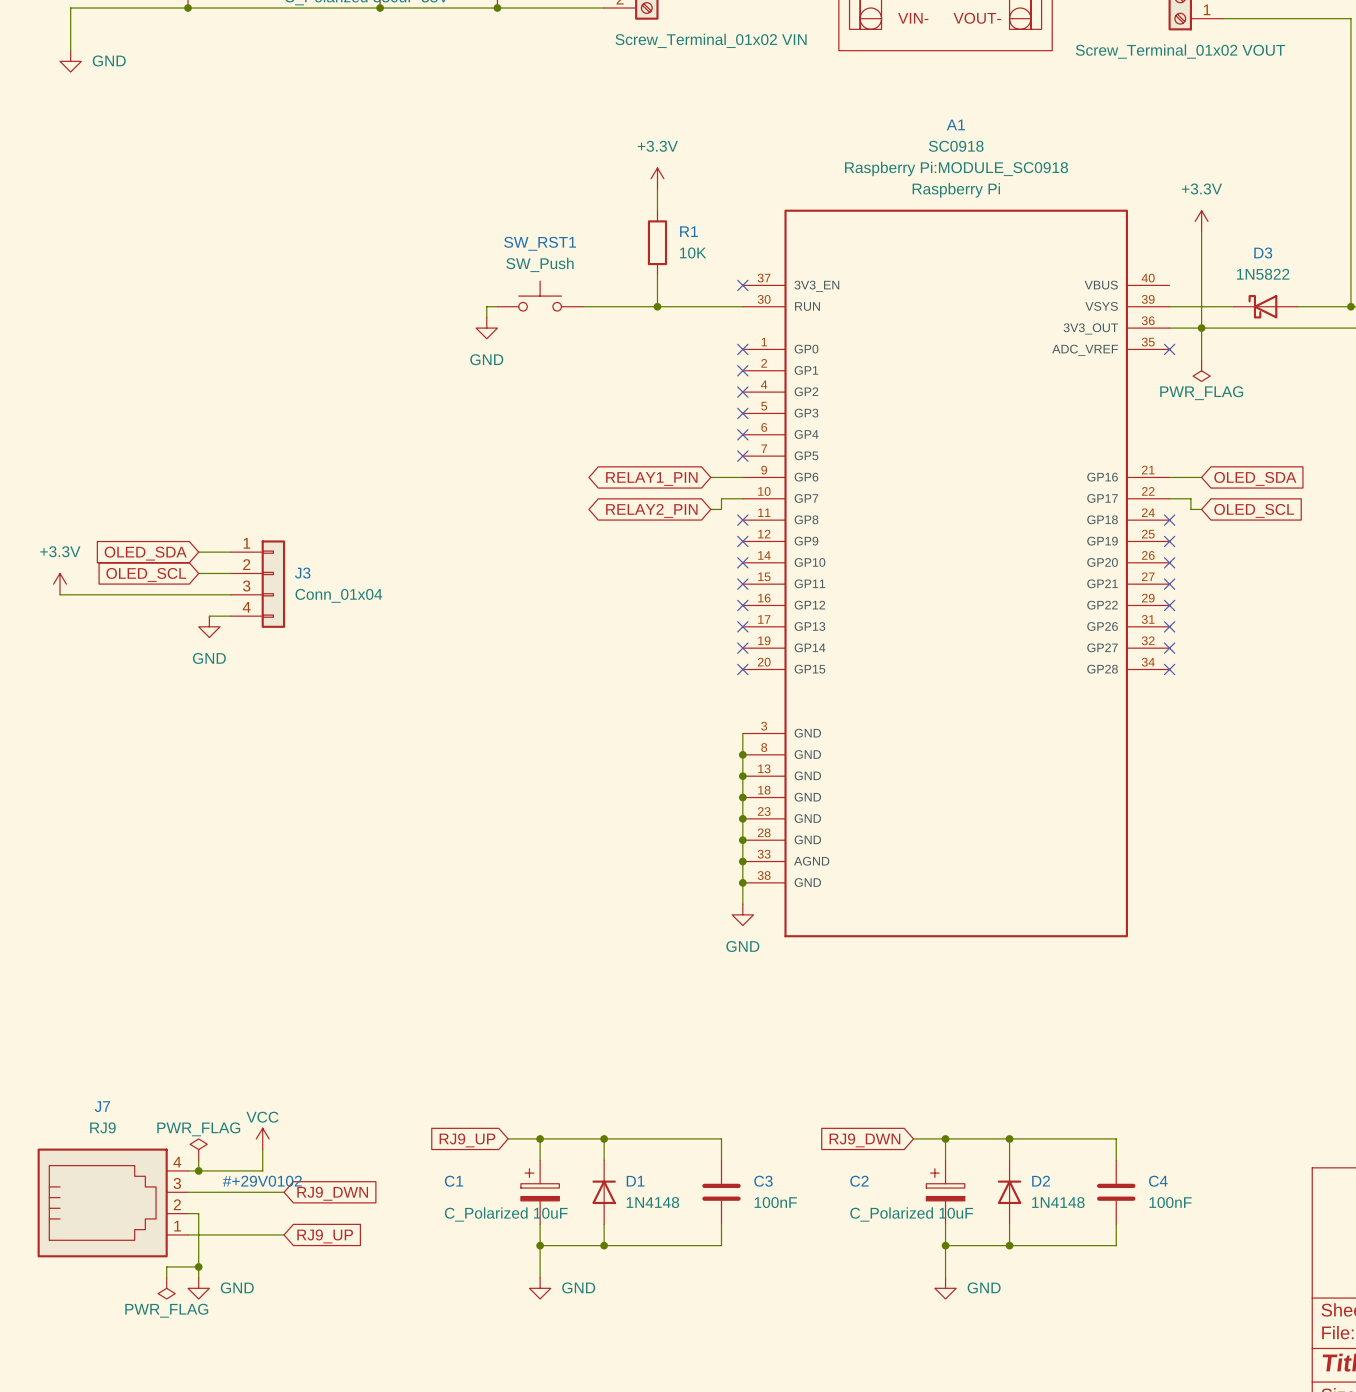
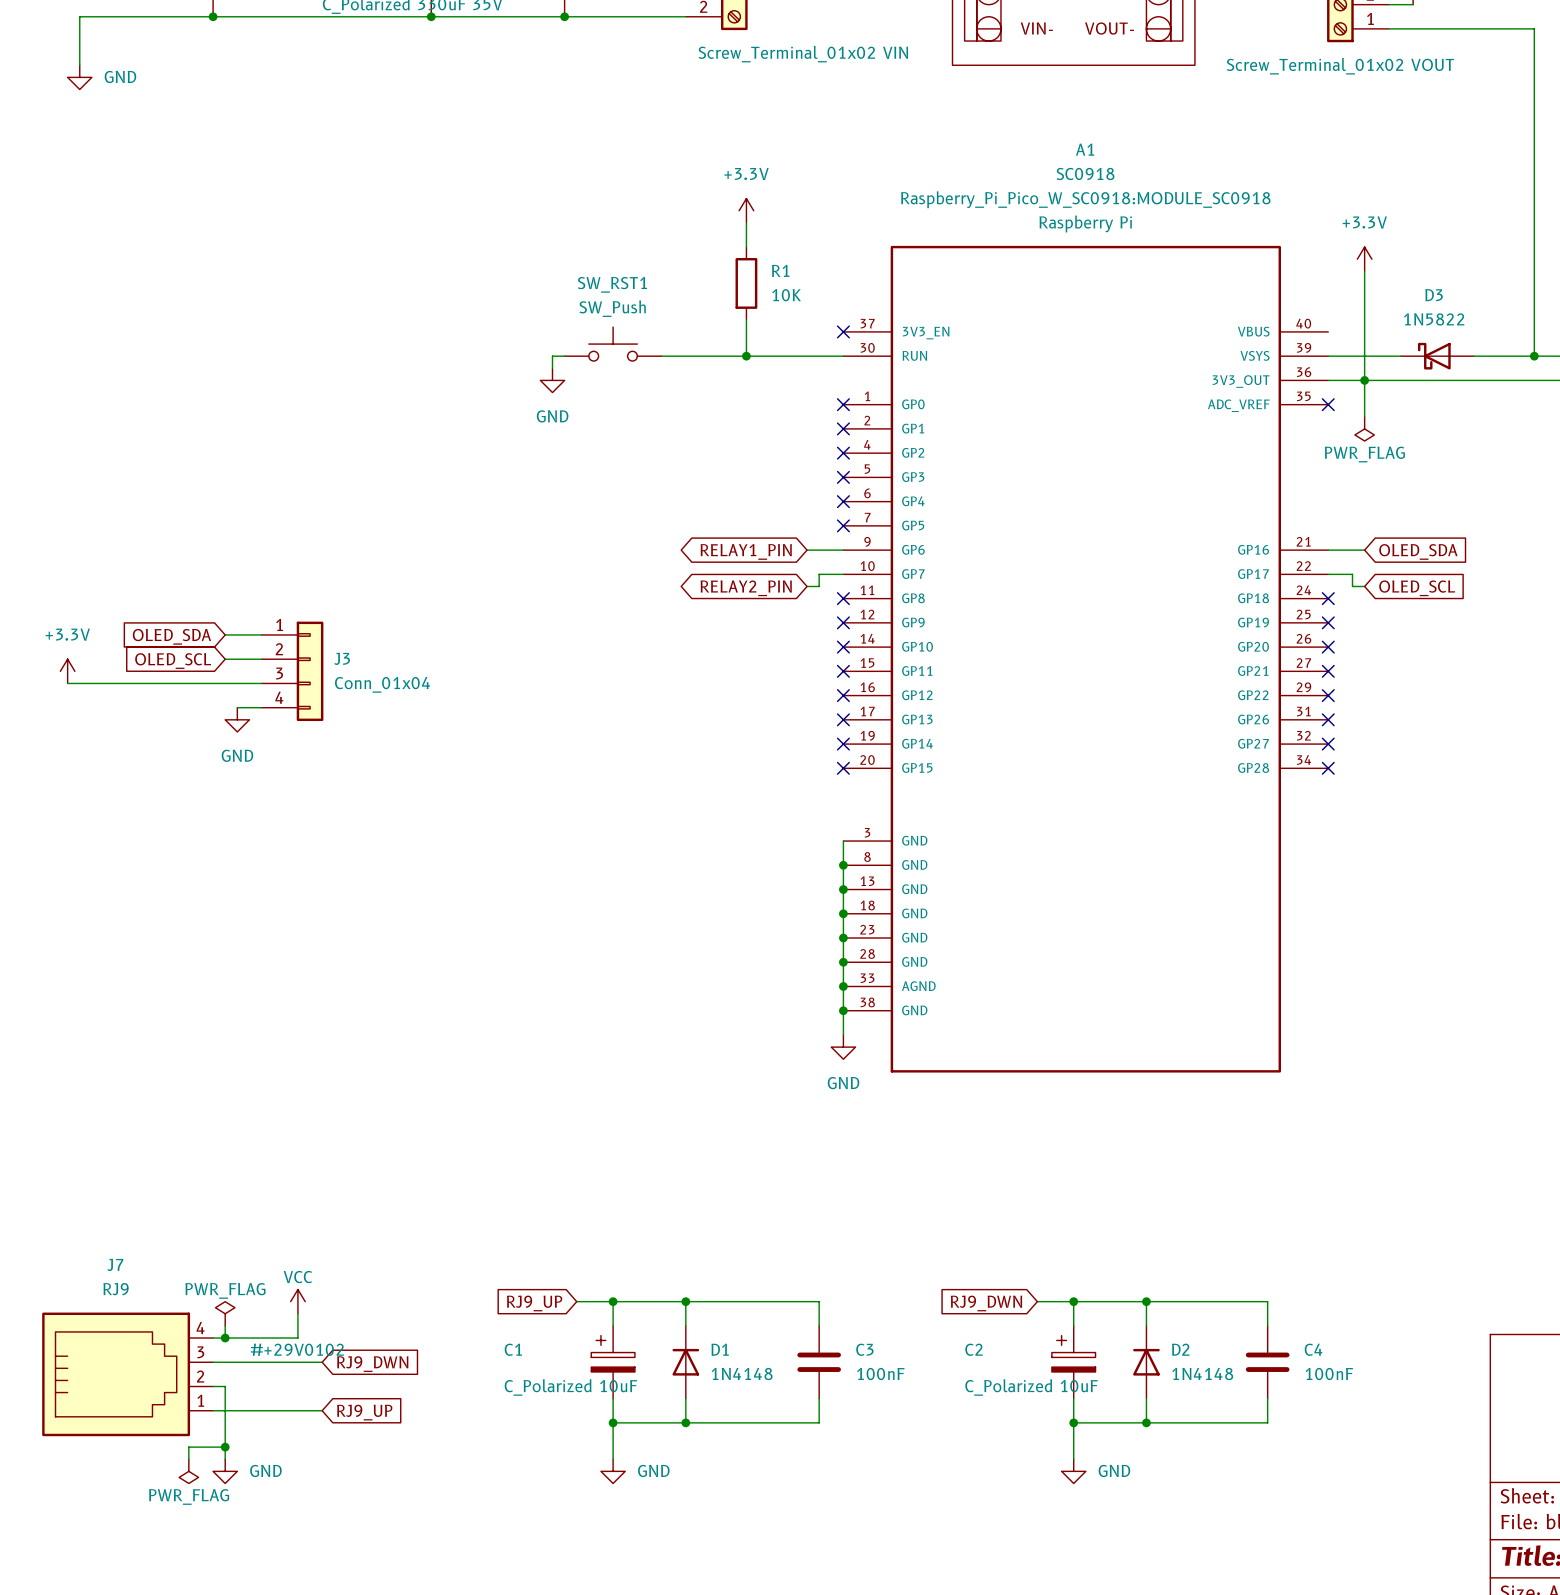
A1 text: Raspberry Pi:MODULE_SC0918 (956, 168) -> Raspberry_Pi_Pico_W_SC0918:MODULE_SC0918 (1085, 199)

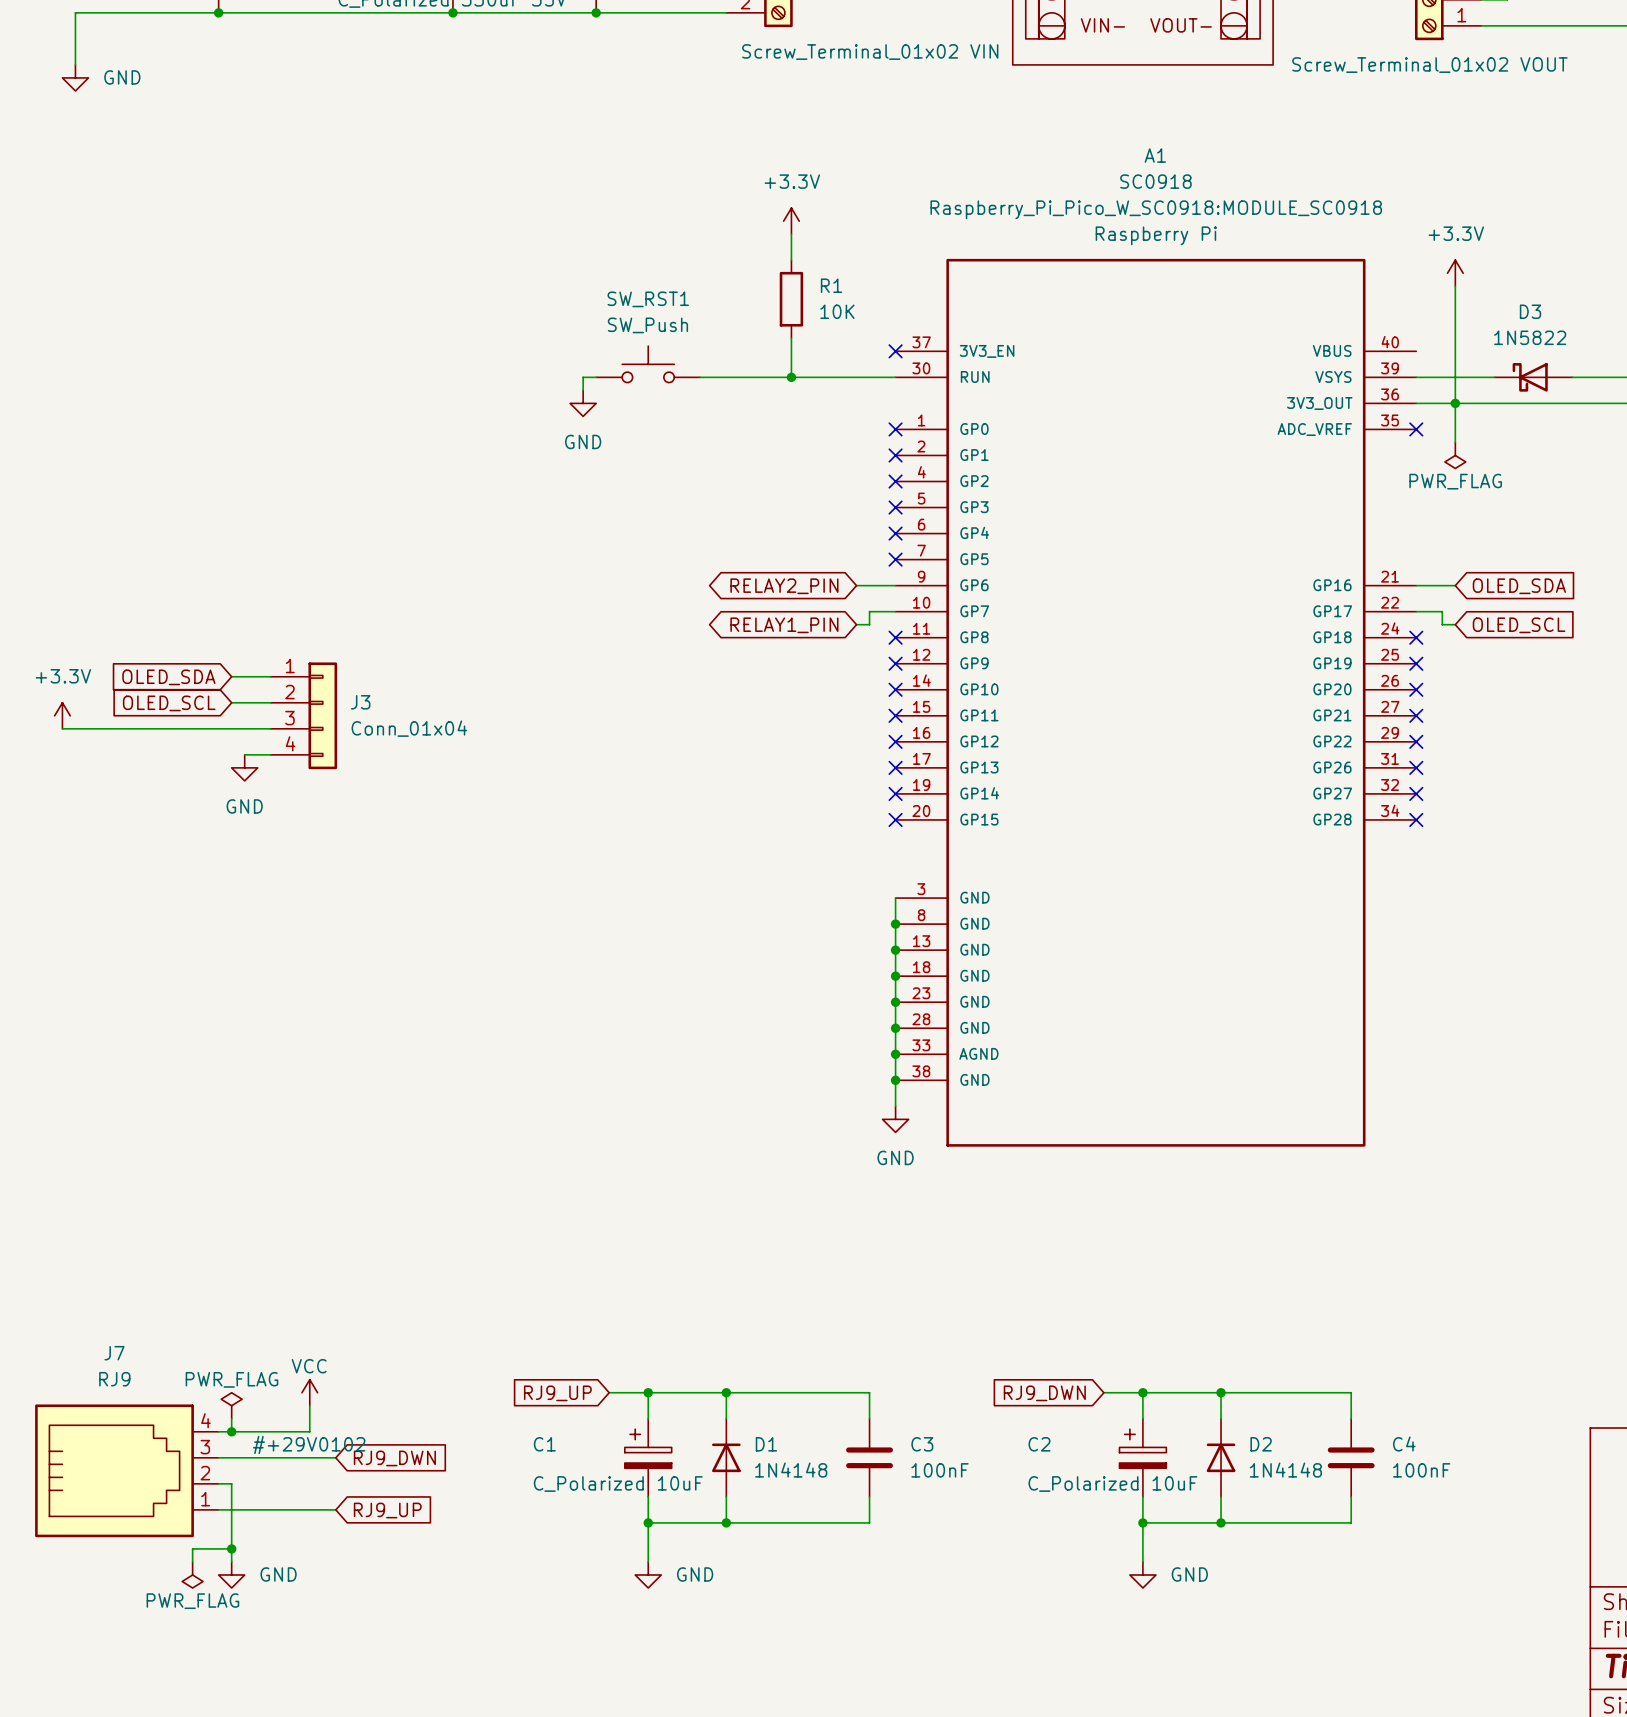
global label: RELAY1_PIN (746, 551) -> RELAY2_PIN (784, 586)
global label: RELAY2_PIN (746, 588) -> RELAY1_PIN (784, 625)

